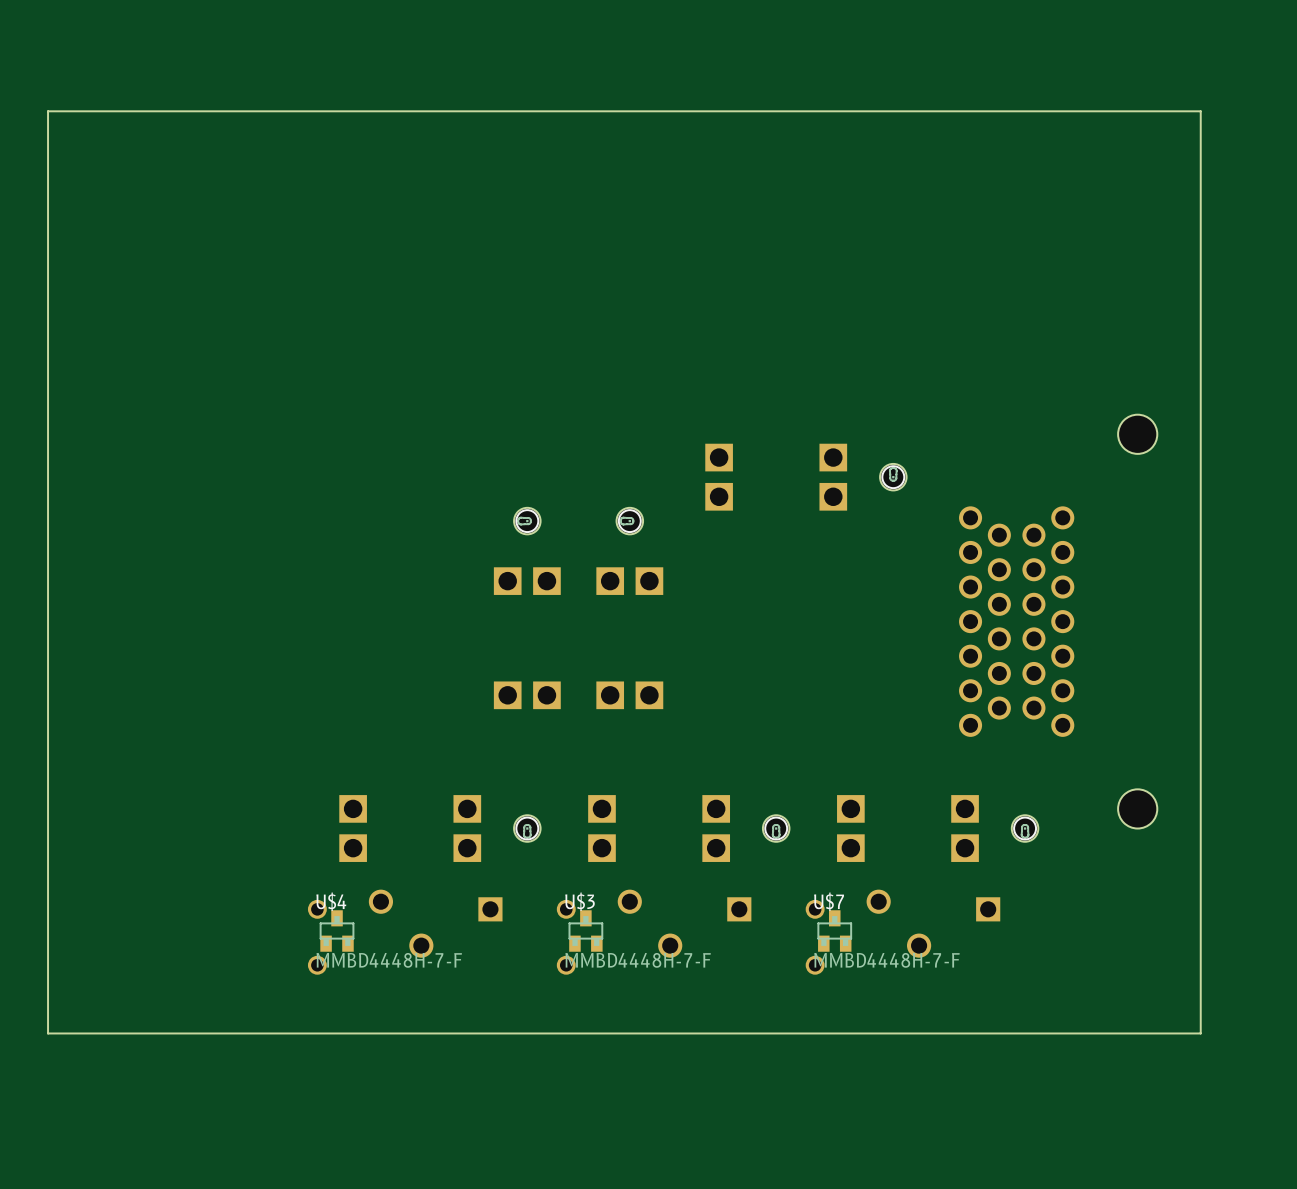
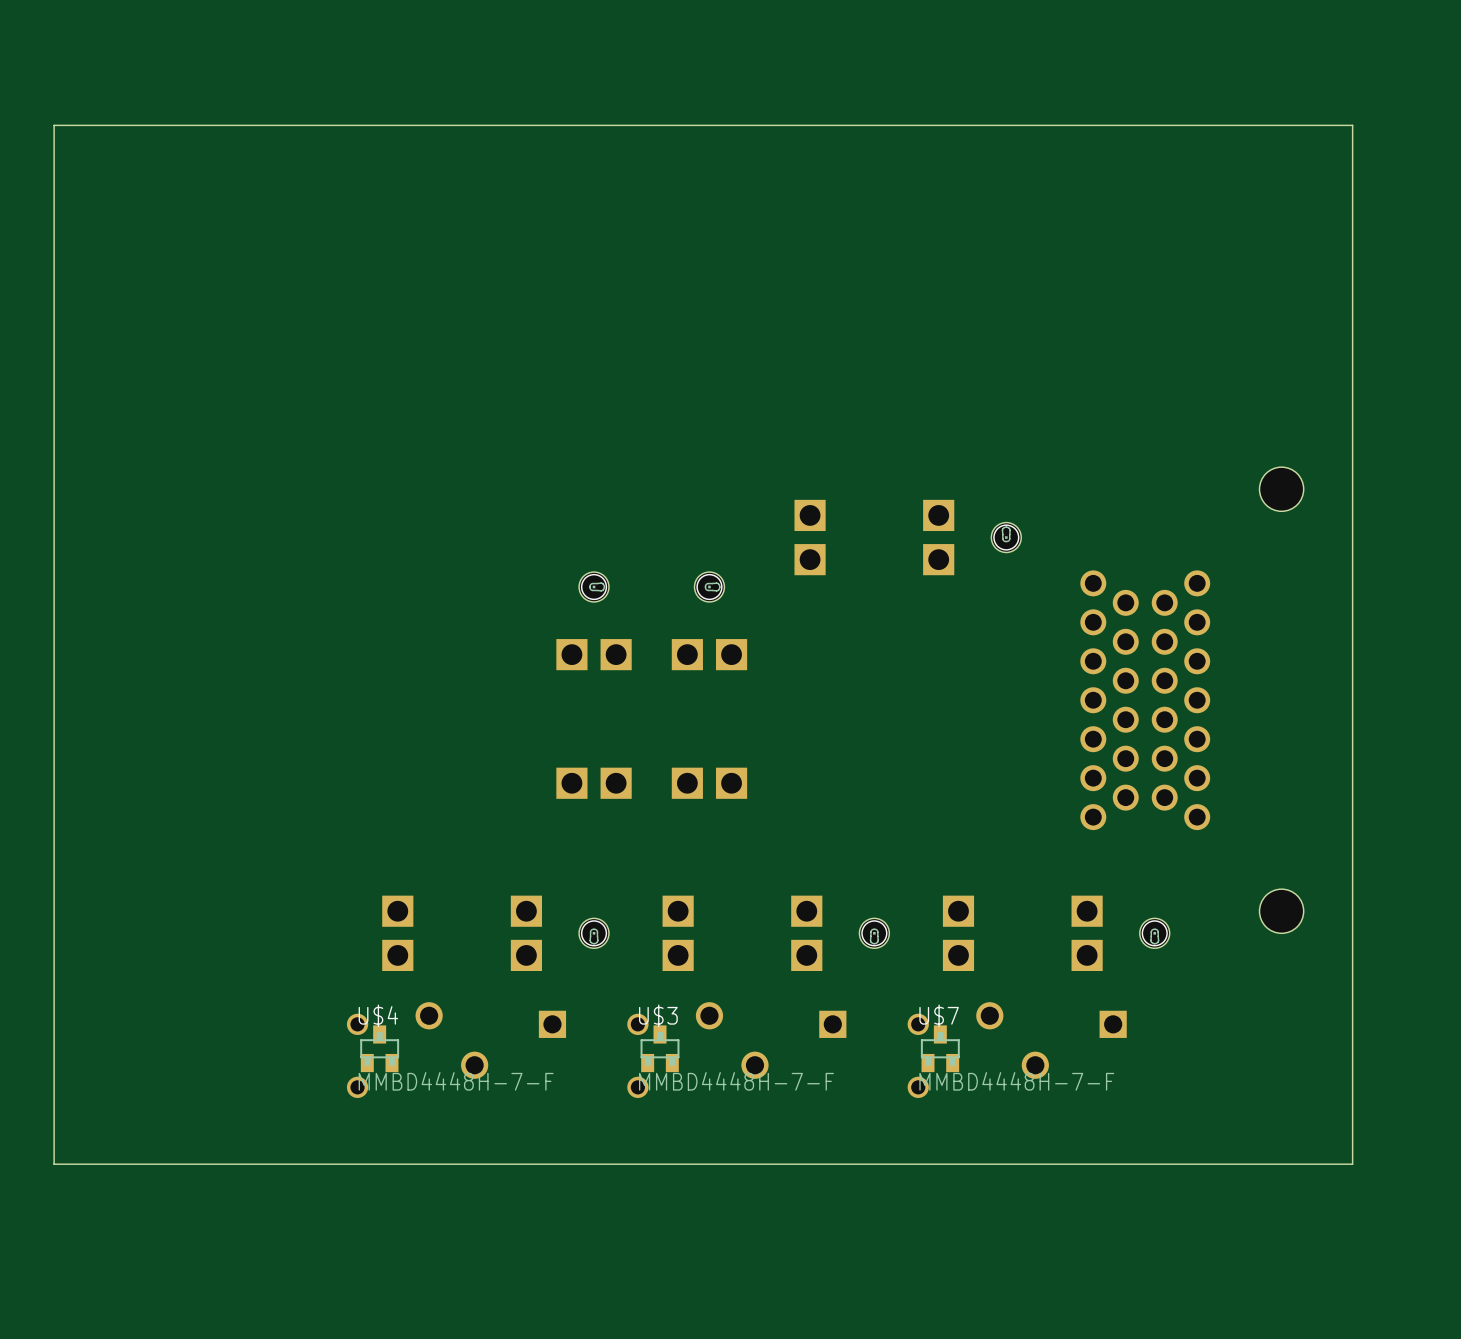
part rotation: 0° (530, 521) -> 180° (590, 587)
part rotation: 0° (632, 521) -> 180° (706, 587)

